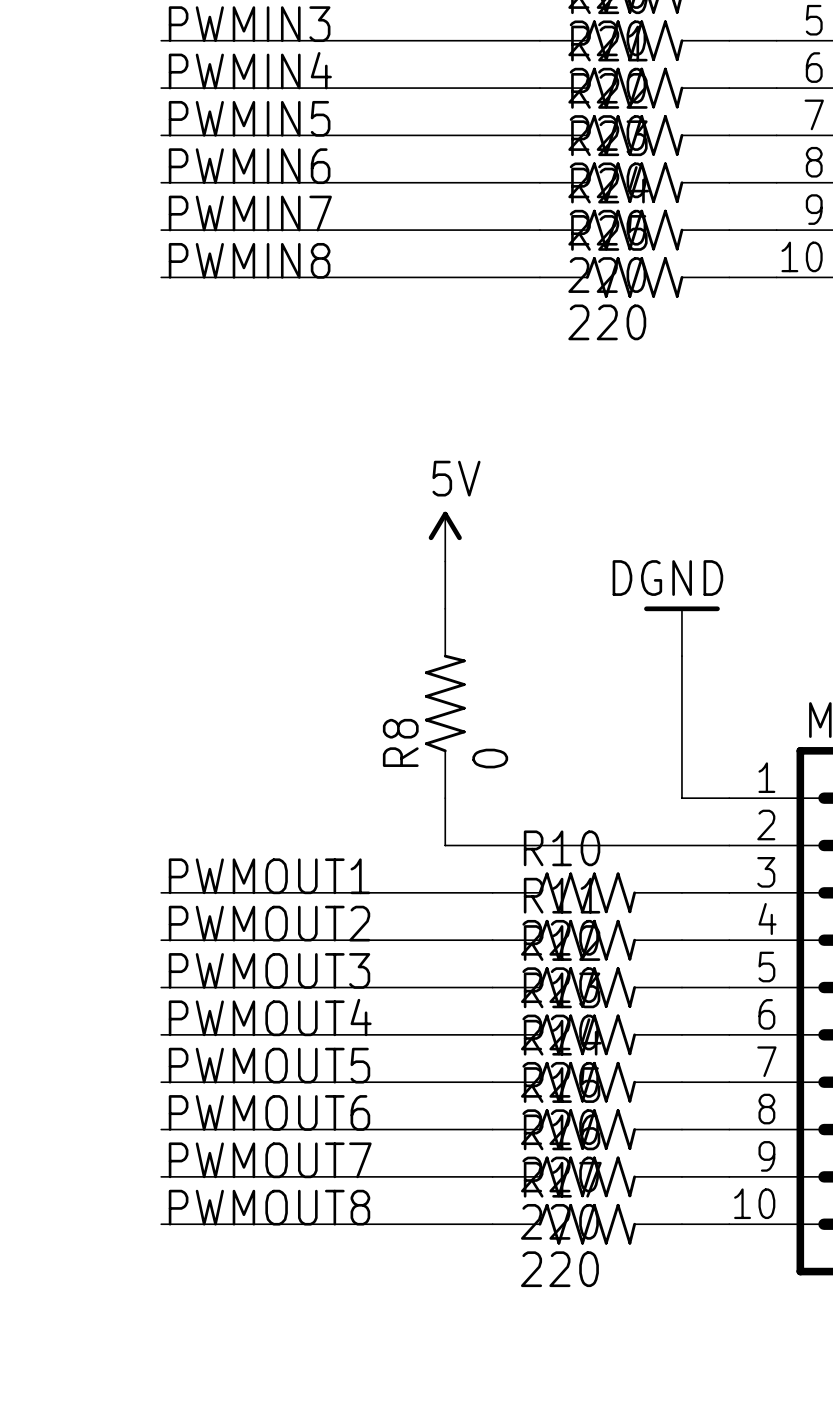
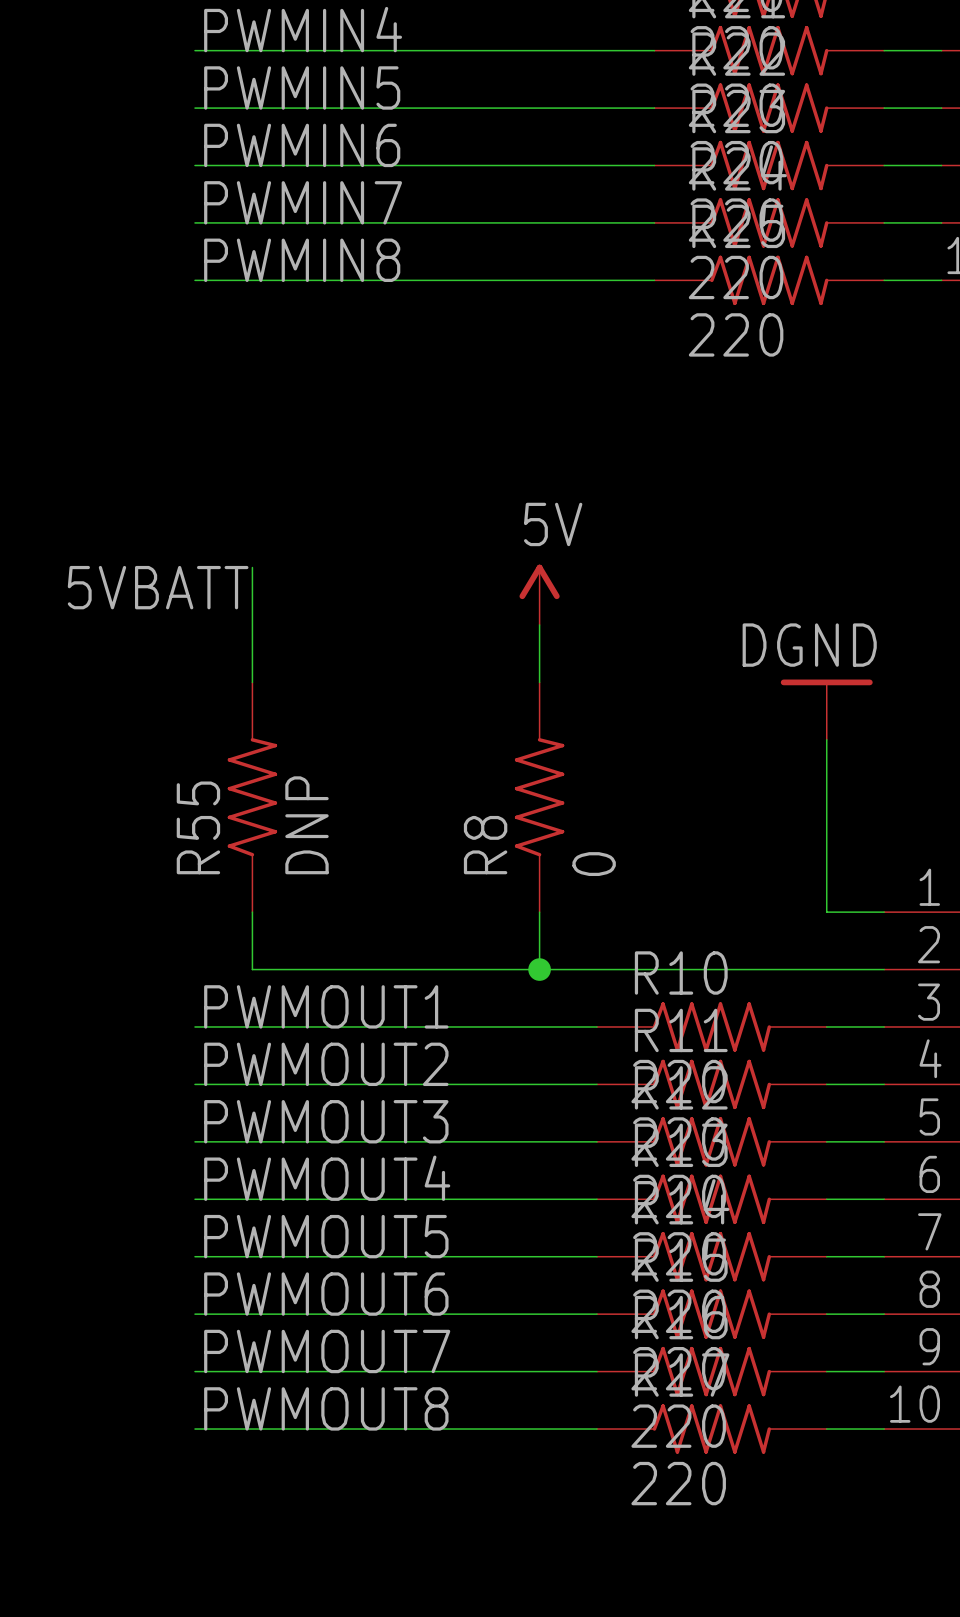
wire: none -> (252, 567) (252, 682)
label: none -> 5VBATT (158, 587)
R55: none -> DNP (252, 797)
wire: none -> (252, 912) (252, 969) (539, 969)
junction: none -> (539, 969)

